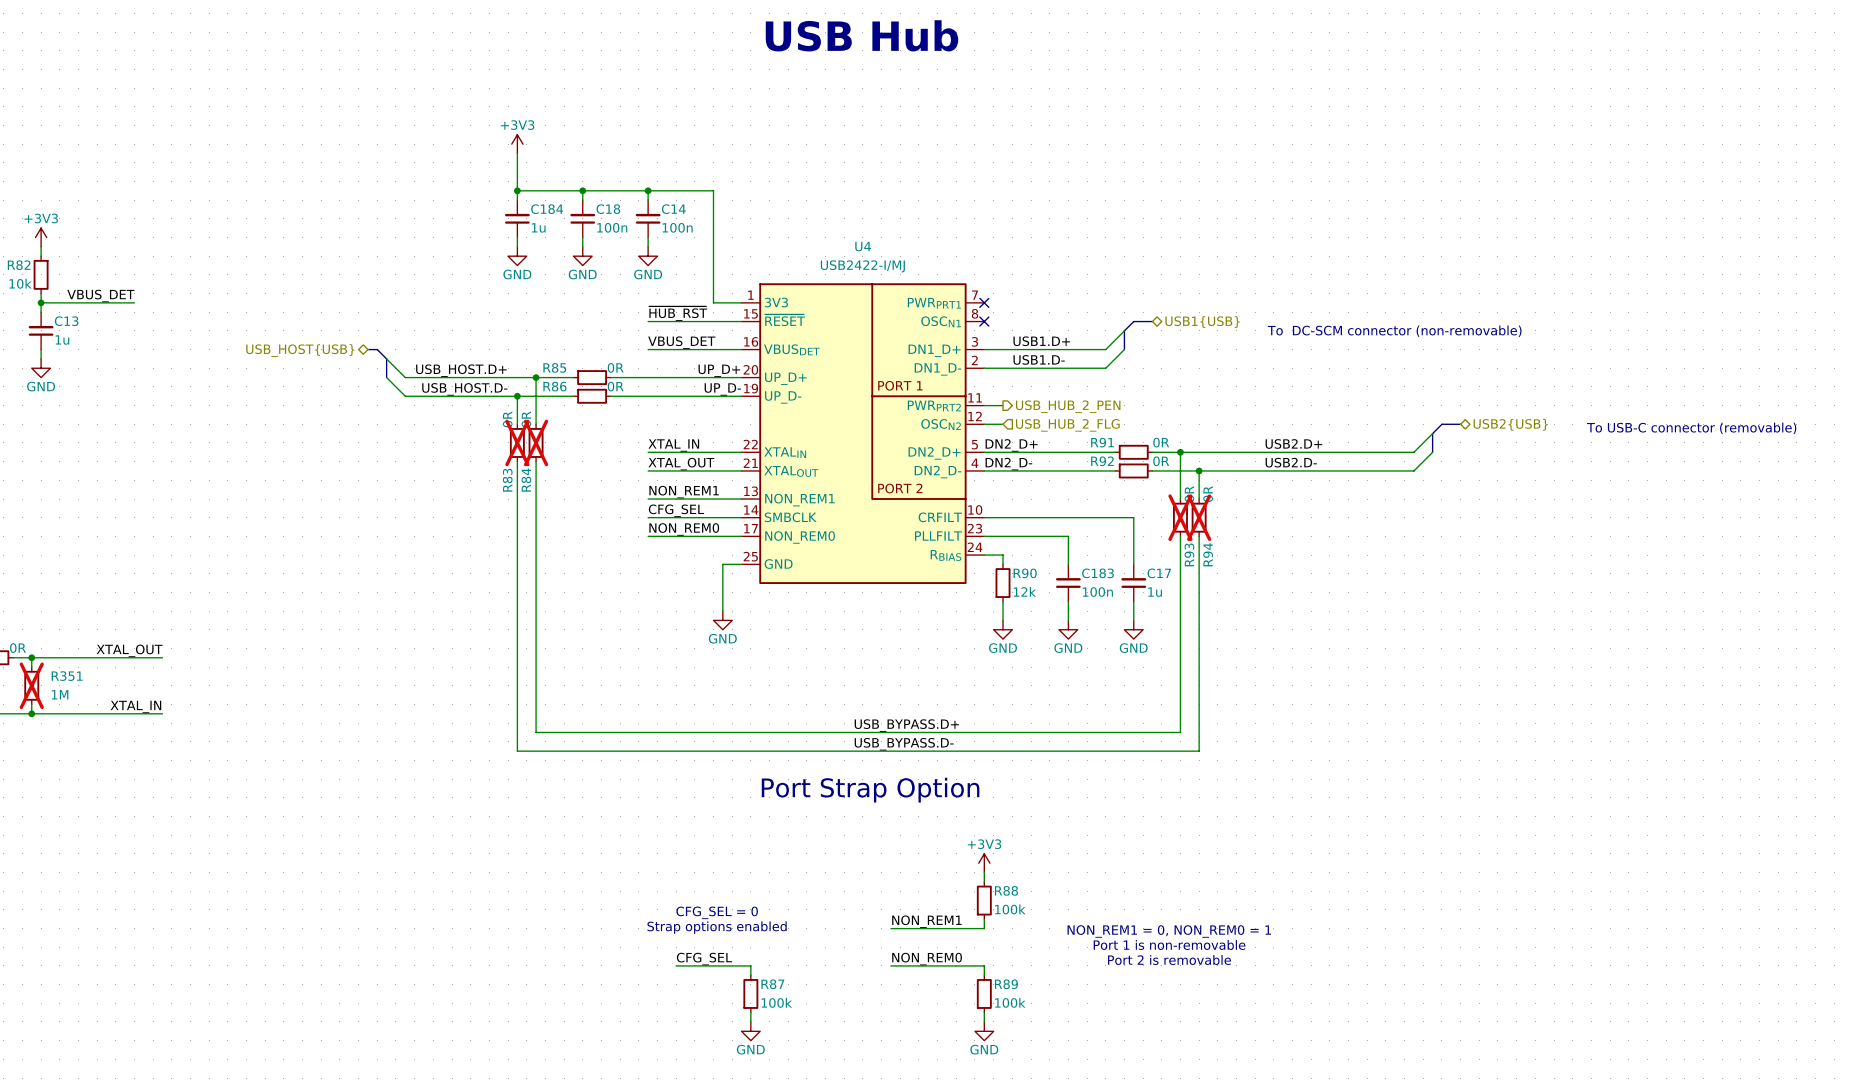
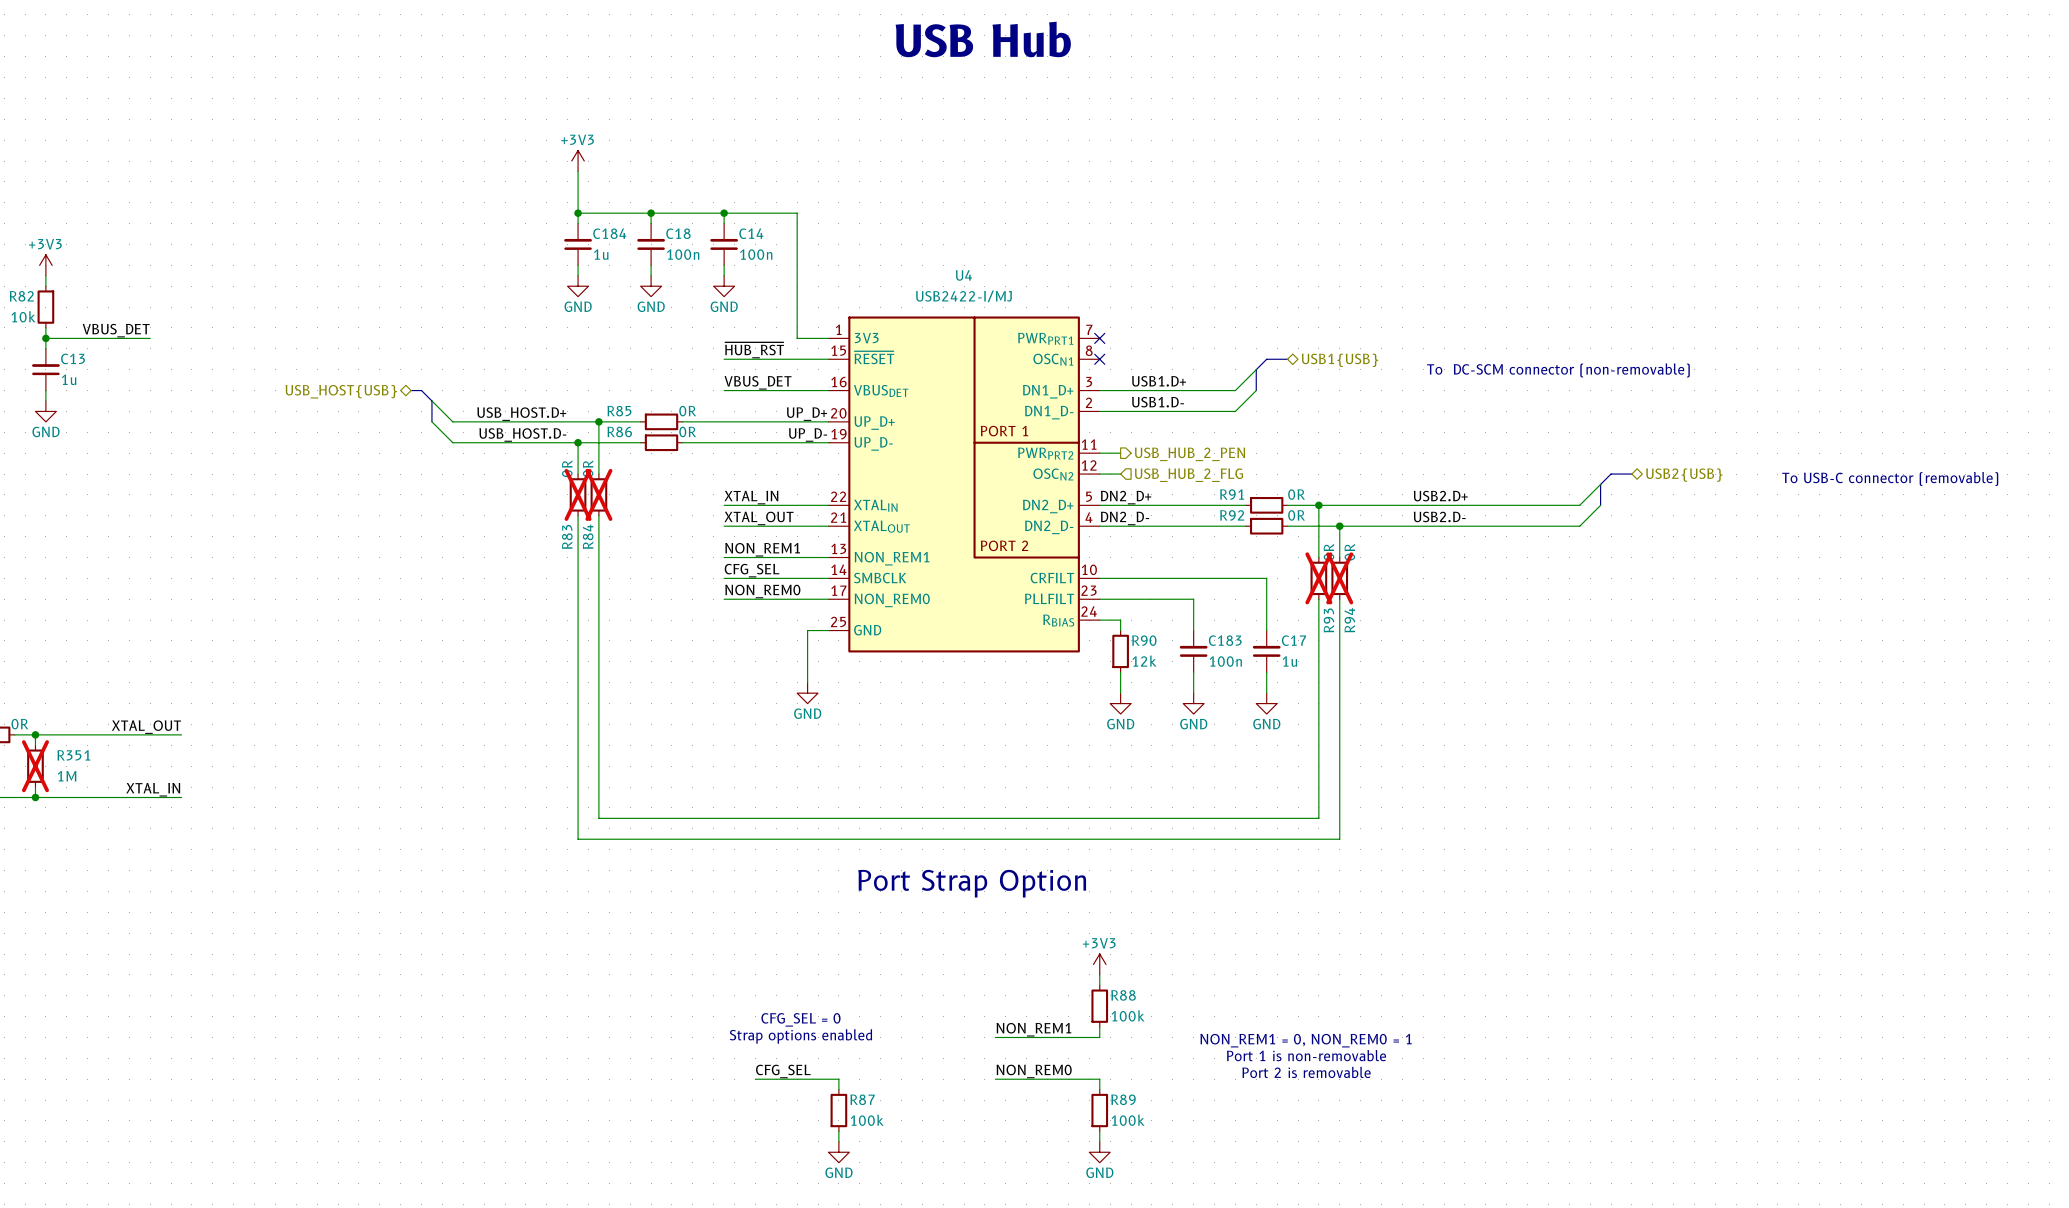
label: USB_BYPASS.D+ (906, 725) -> none
label: USB_BYPASS.D- (904, 744) -> none

